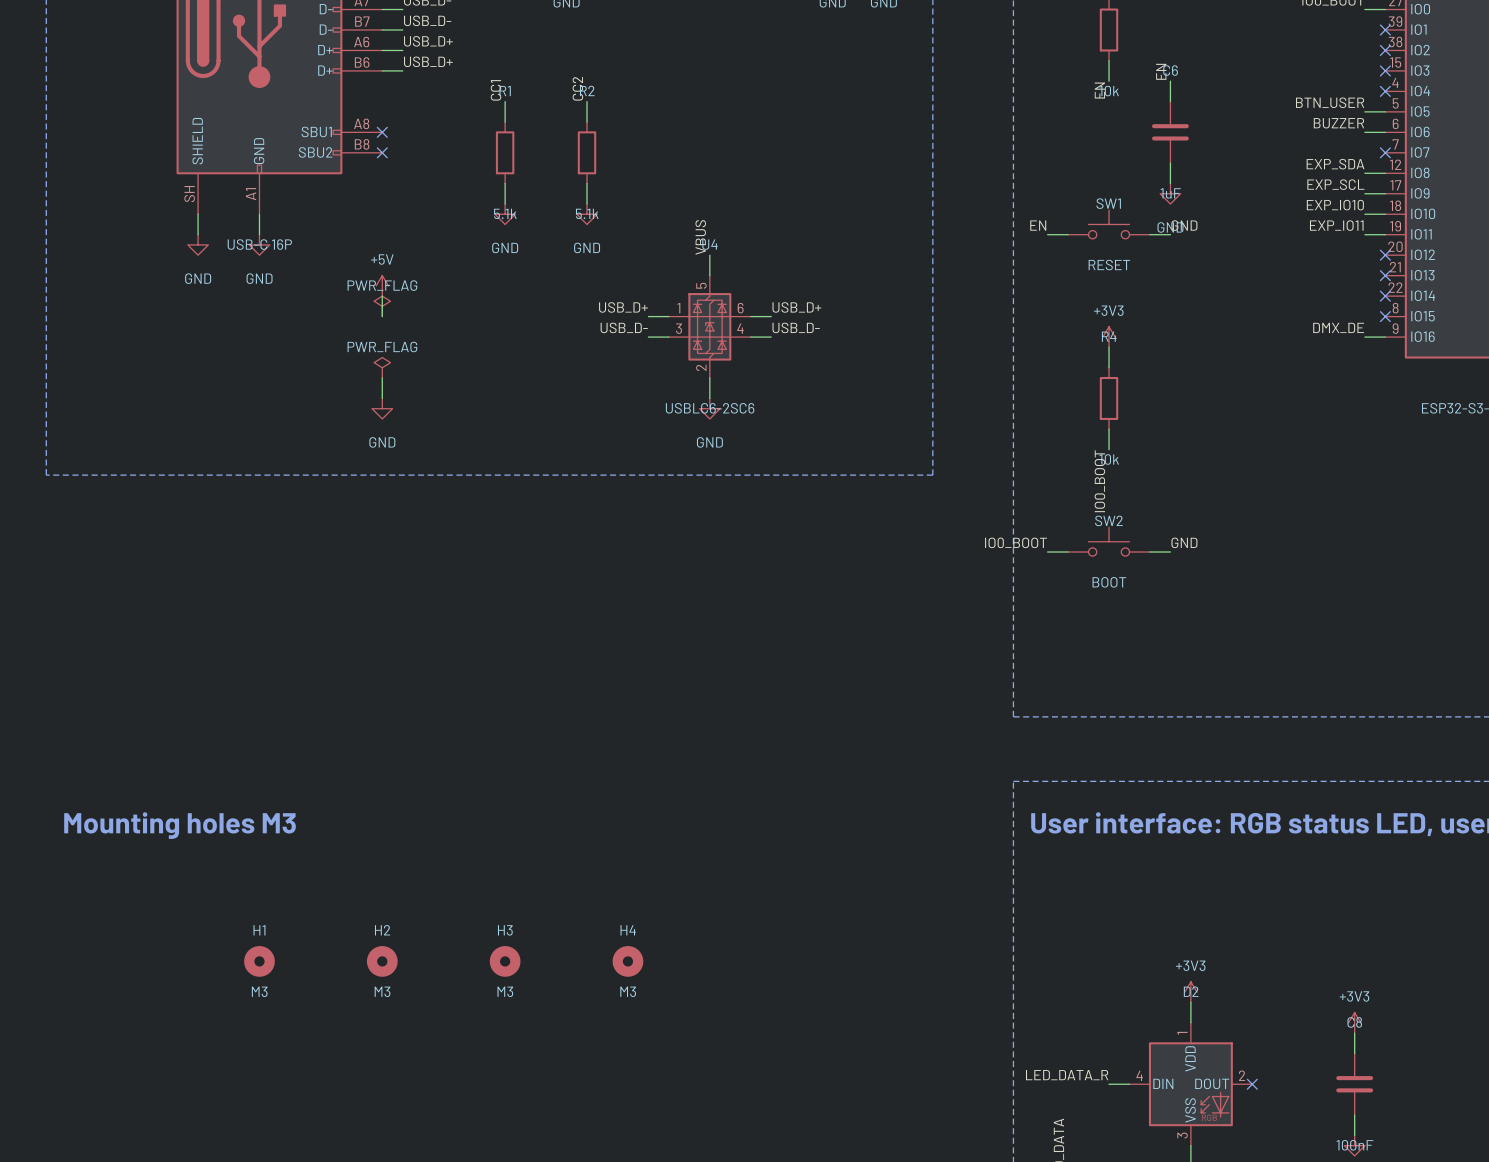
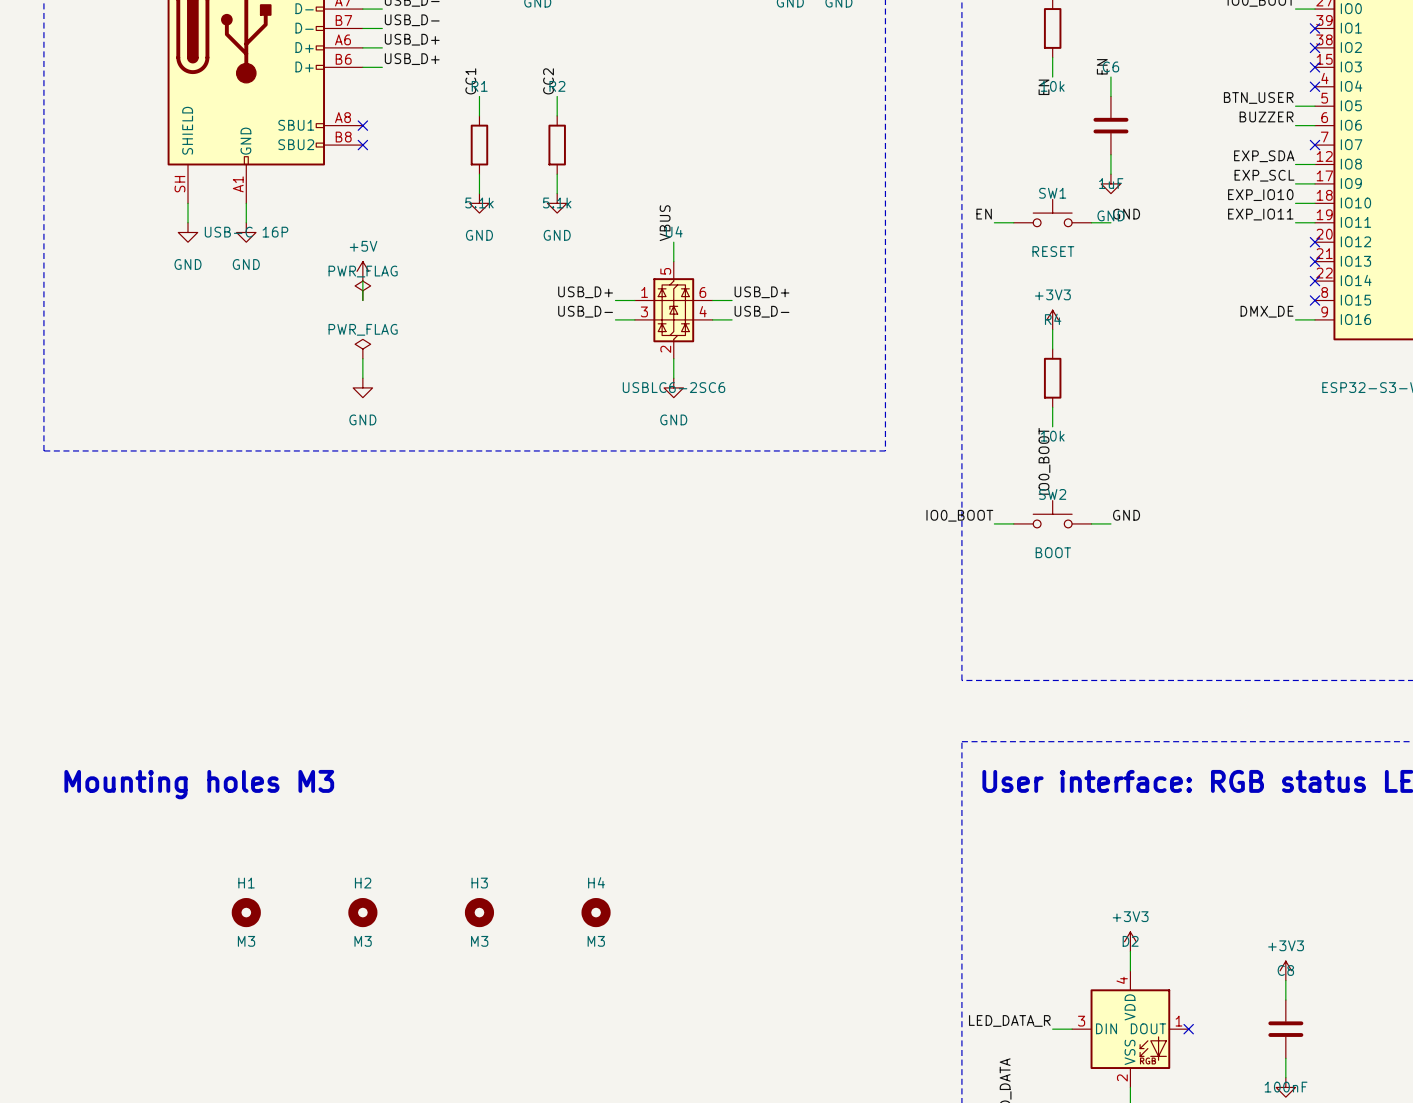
D2 pin number: 1 (1182, 1033) -> 4 (1122, 980)
D2 pin number: 4 (1139, 1075) -> 3 (1081, 1021)
D2 pin number: 2 (1242, 1075) -> 1 (1178, 1021)
D2 pin number: 3 (1182, 1135) -> 2 (1122, 1077)

